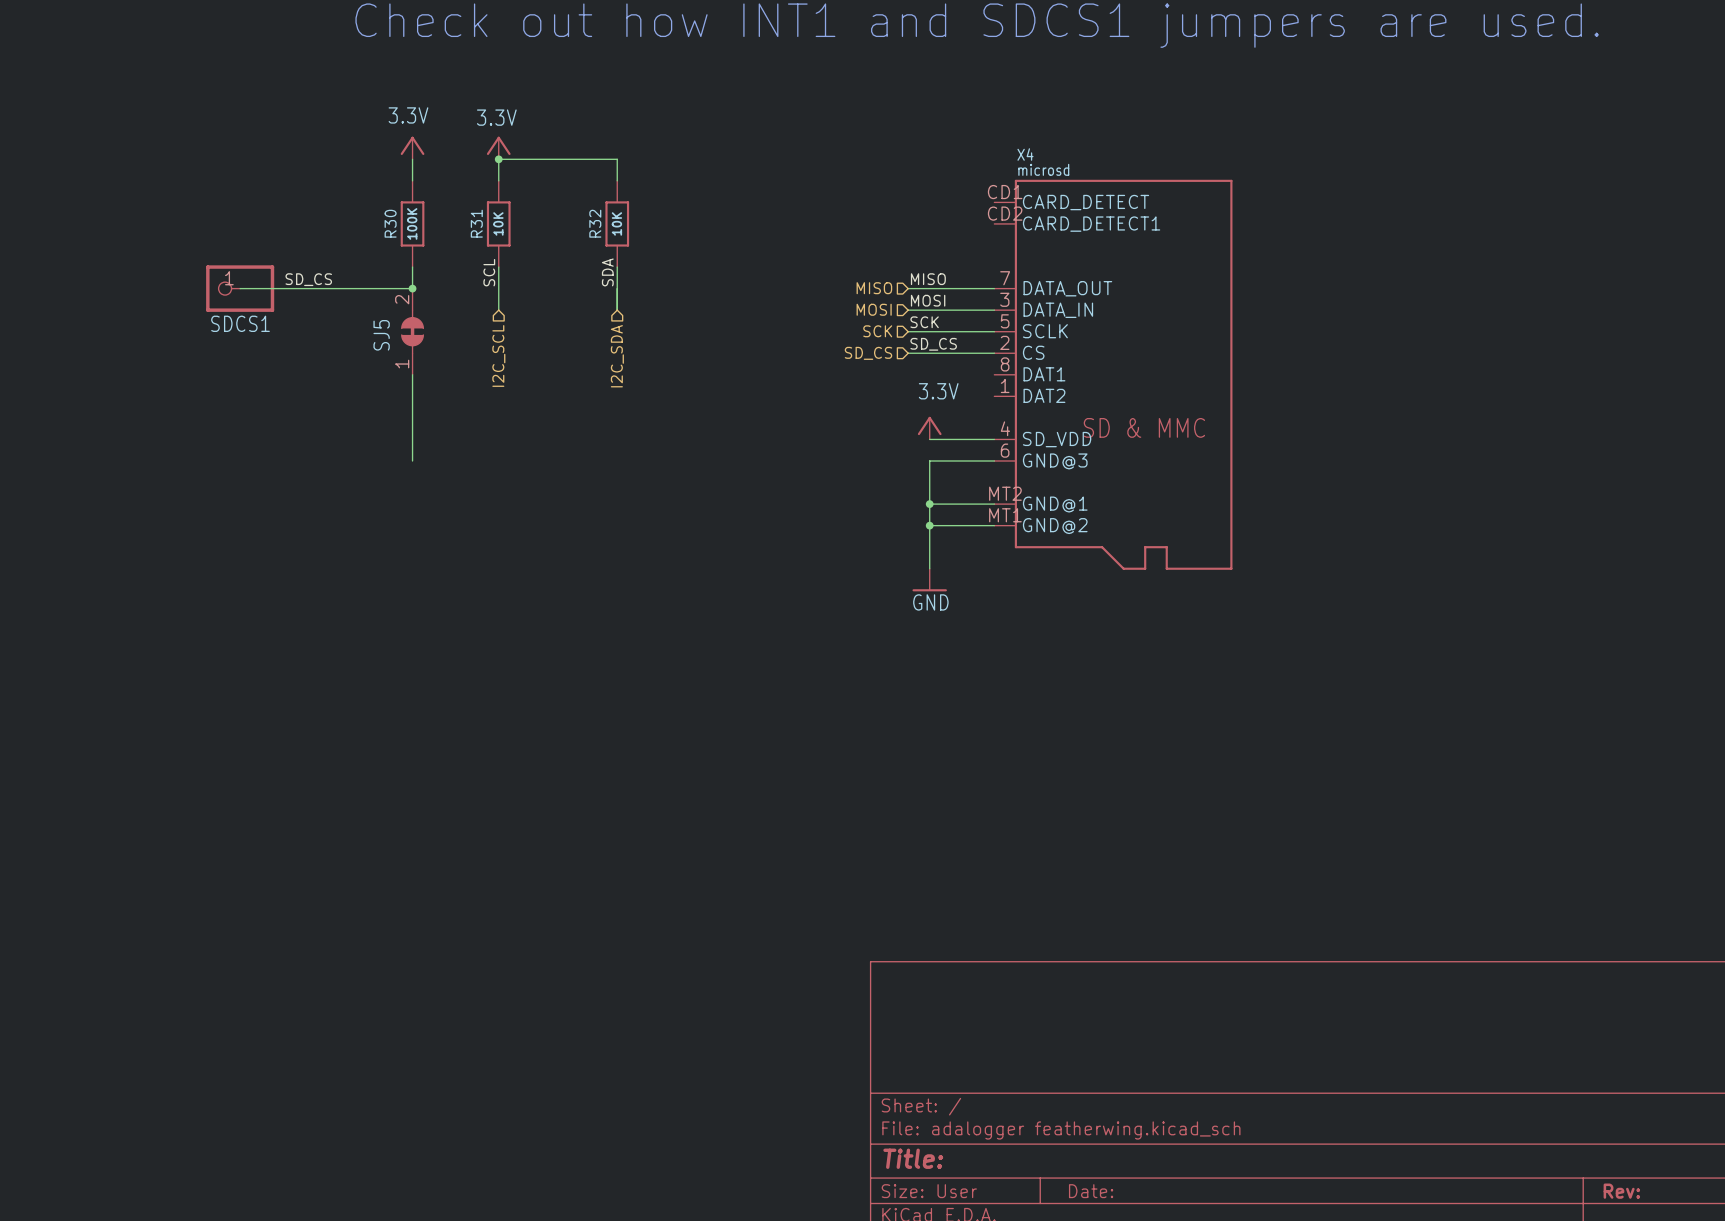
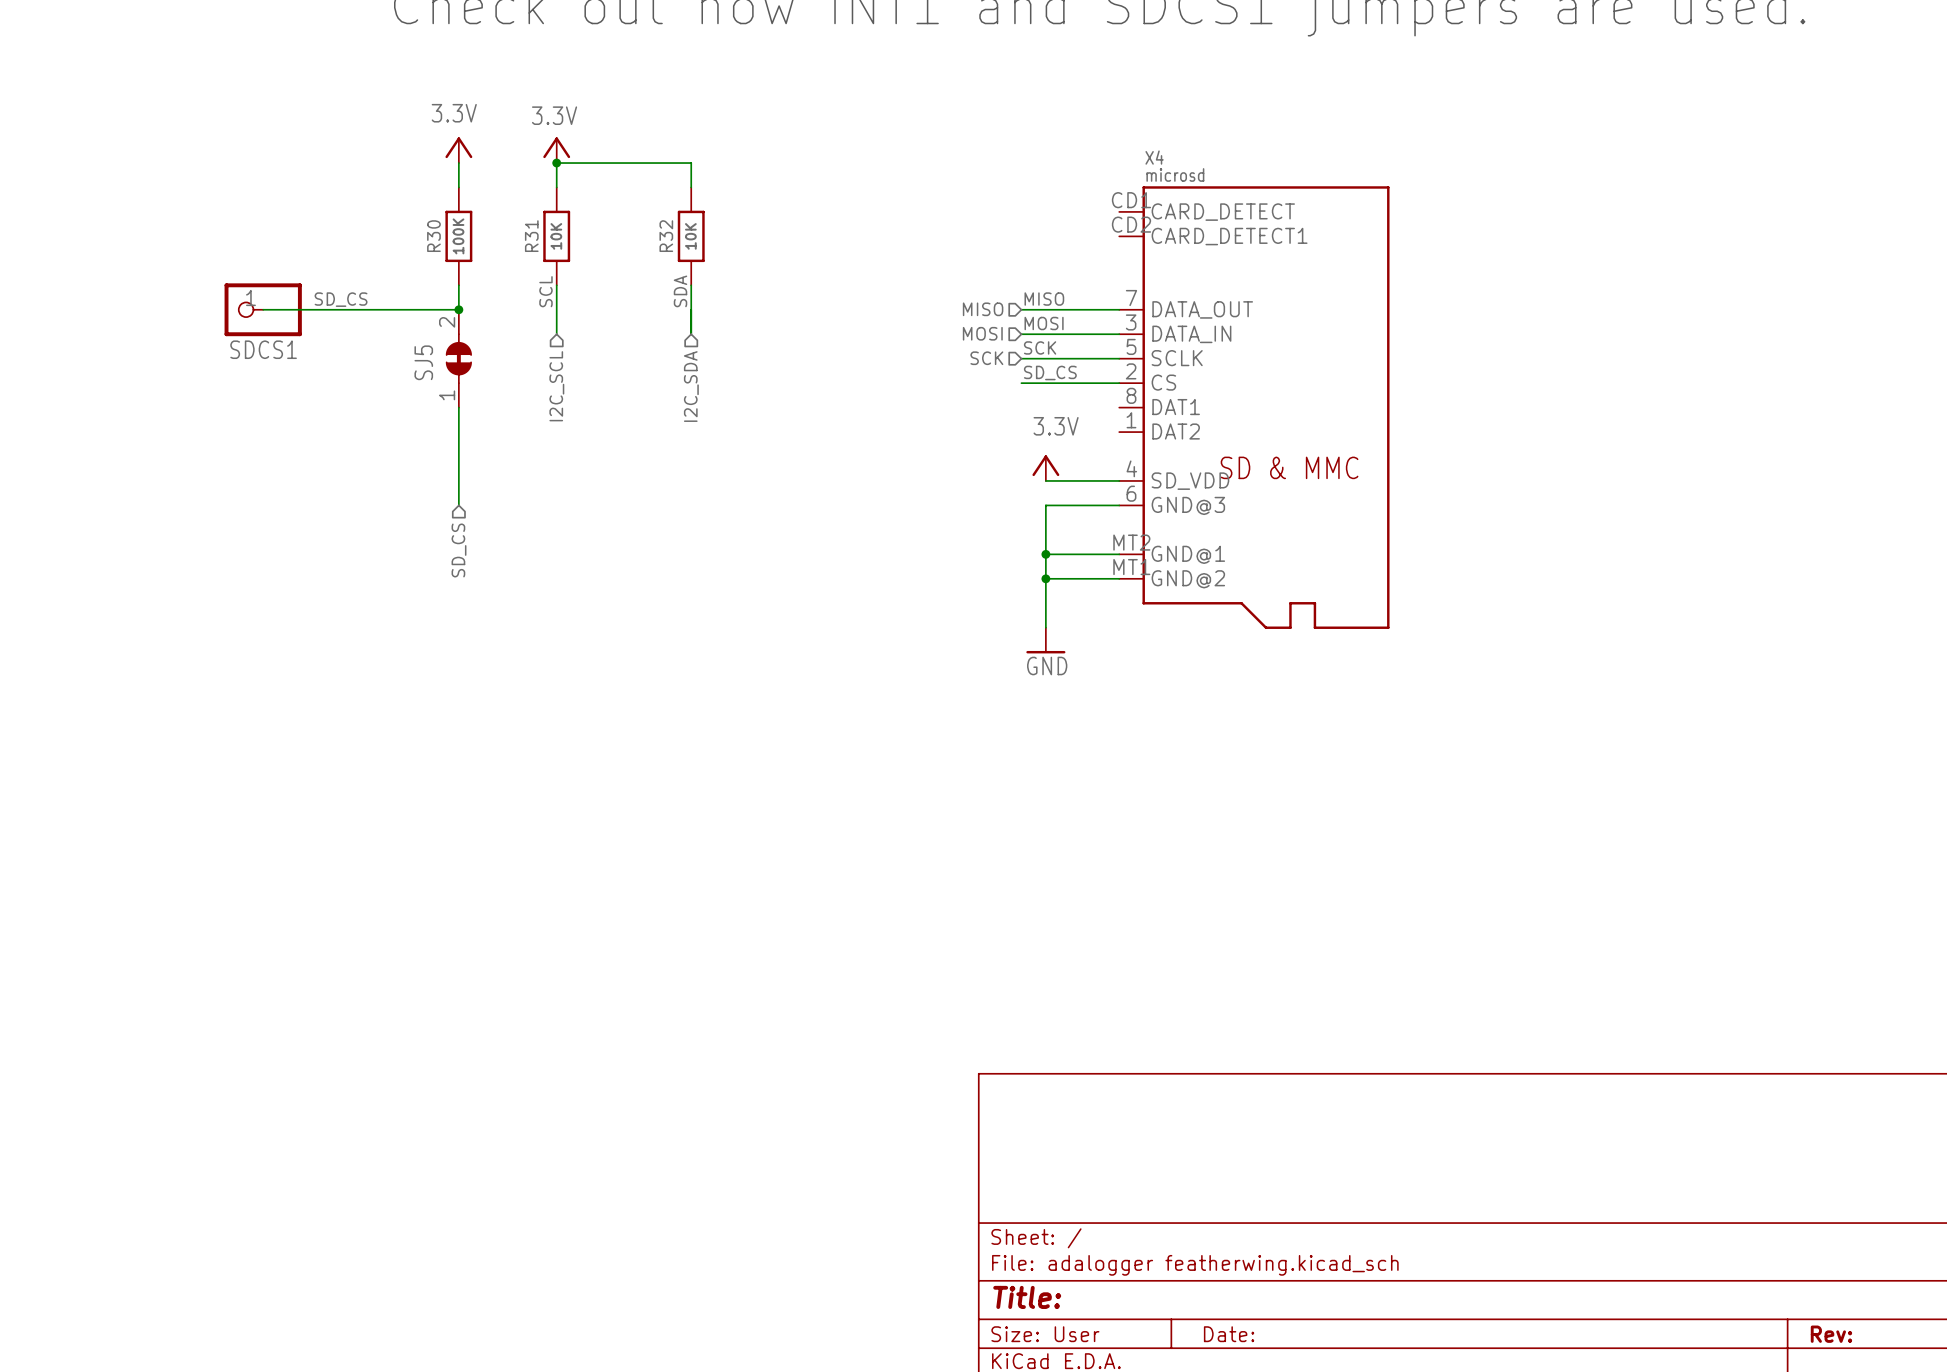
hierarchical label: SD_CS (868, 353) -> none
hierarchical label: none -> SD_CS (459, 550)

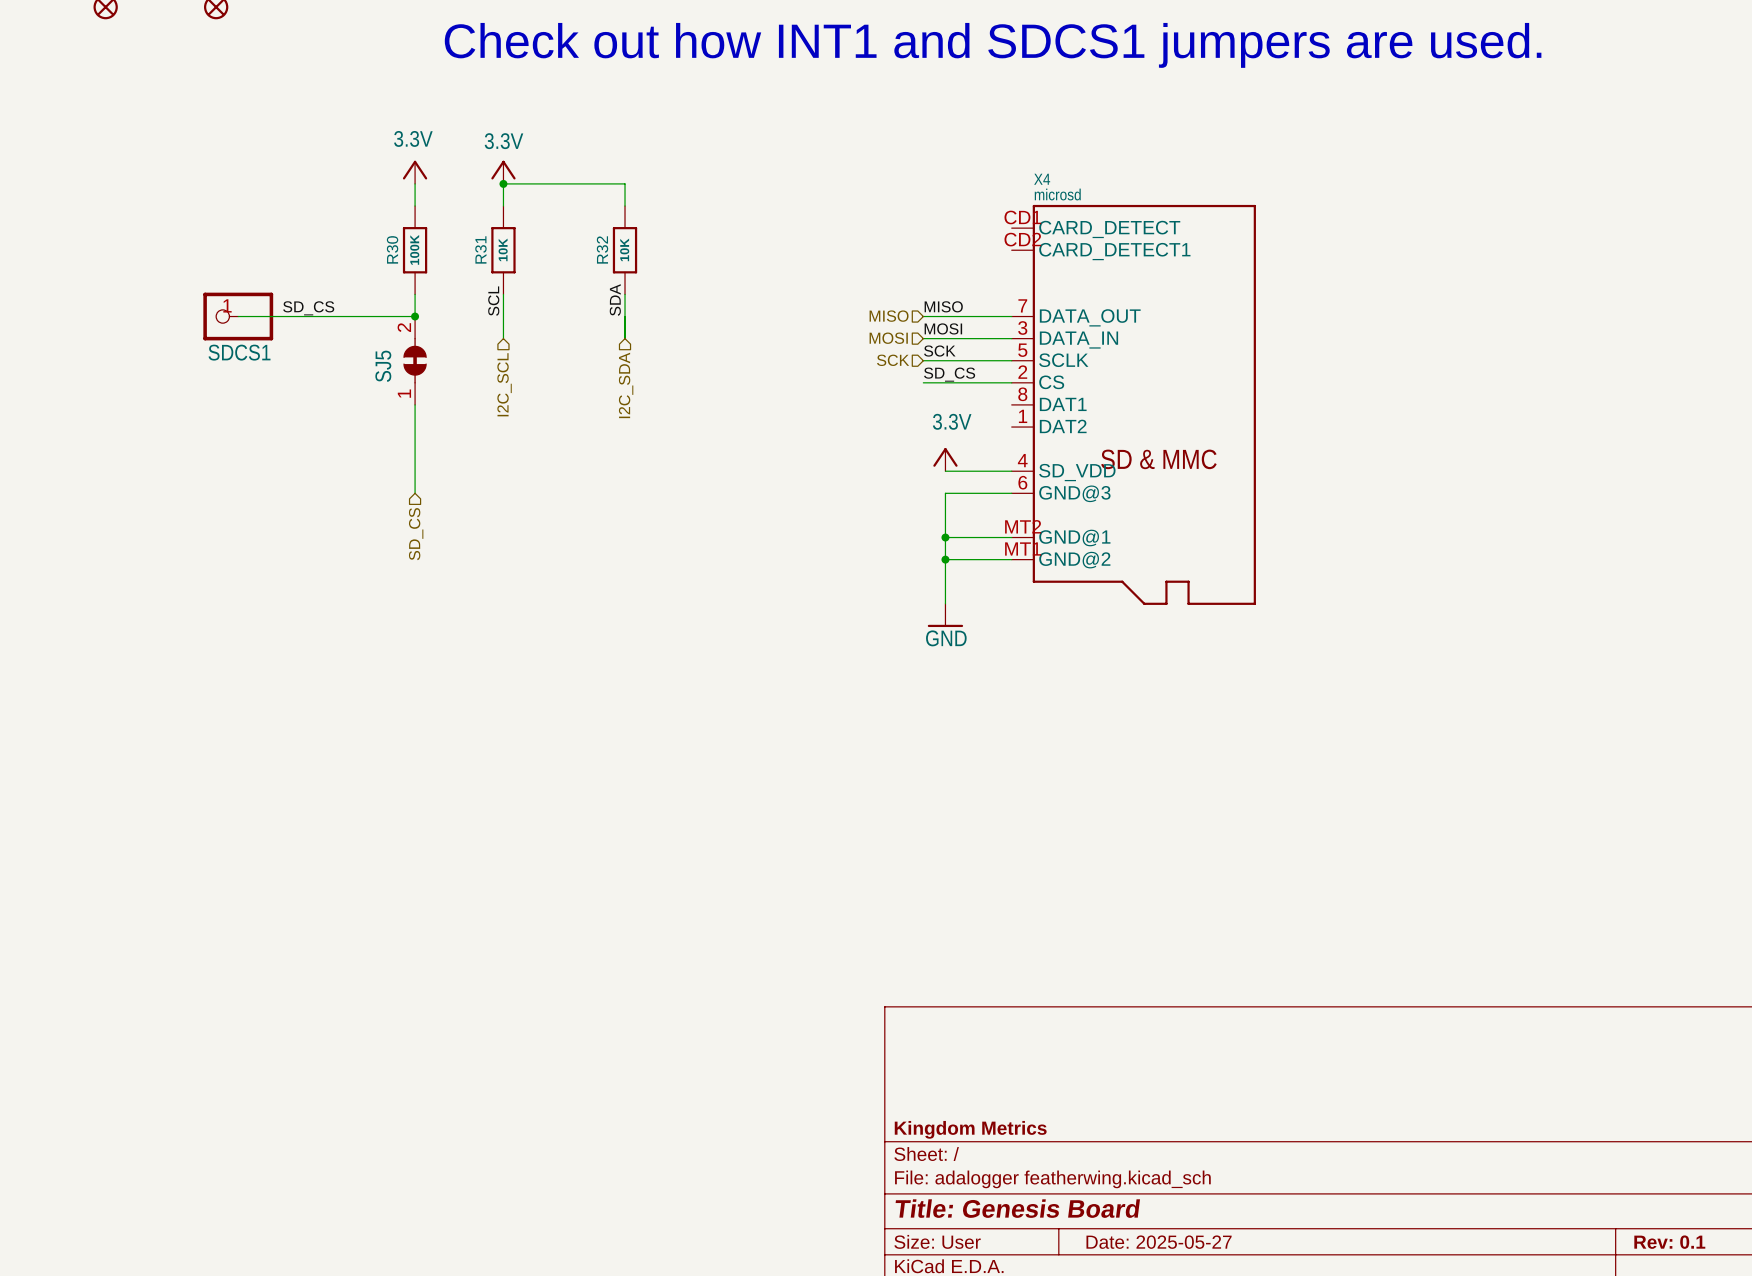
title block: none -> Kingdom Metrics (970, 1129)
title block: Title: (1027, 1297) -> Title: Genesis Board (1017, 1208)
title block: Date: (1229, 1334) -> Date: 2025-05-27 (1159, 1242)
title block: Rev: (1831, 1334) -> Rev: 0.1 (1669, 1242)

